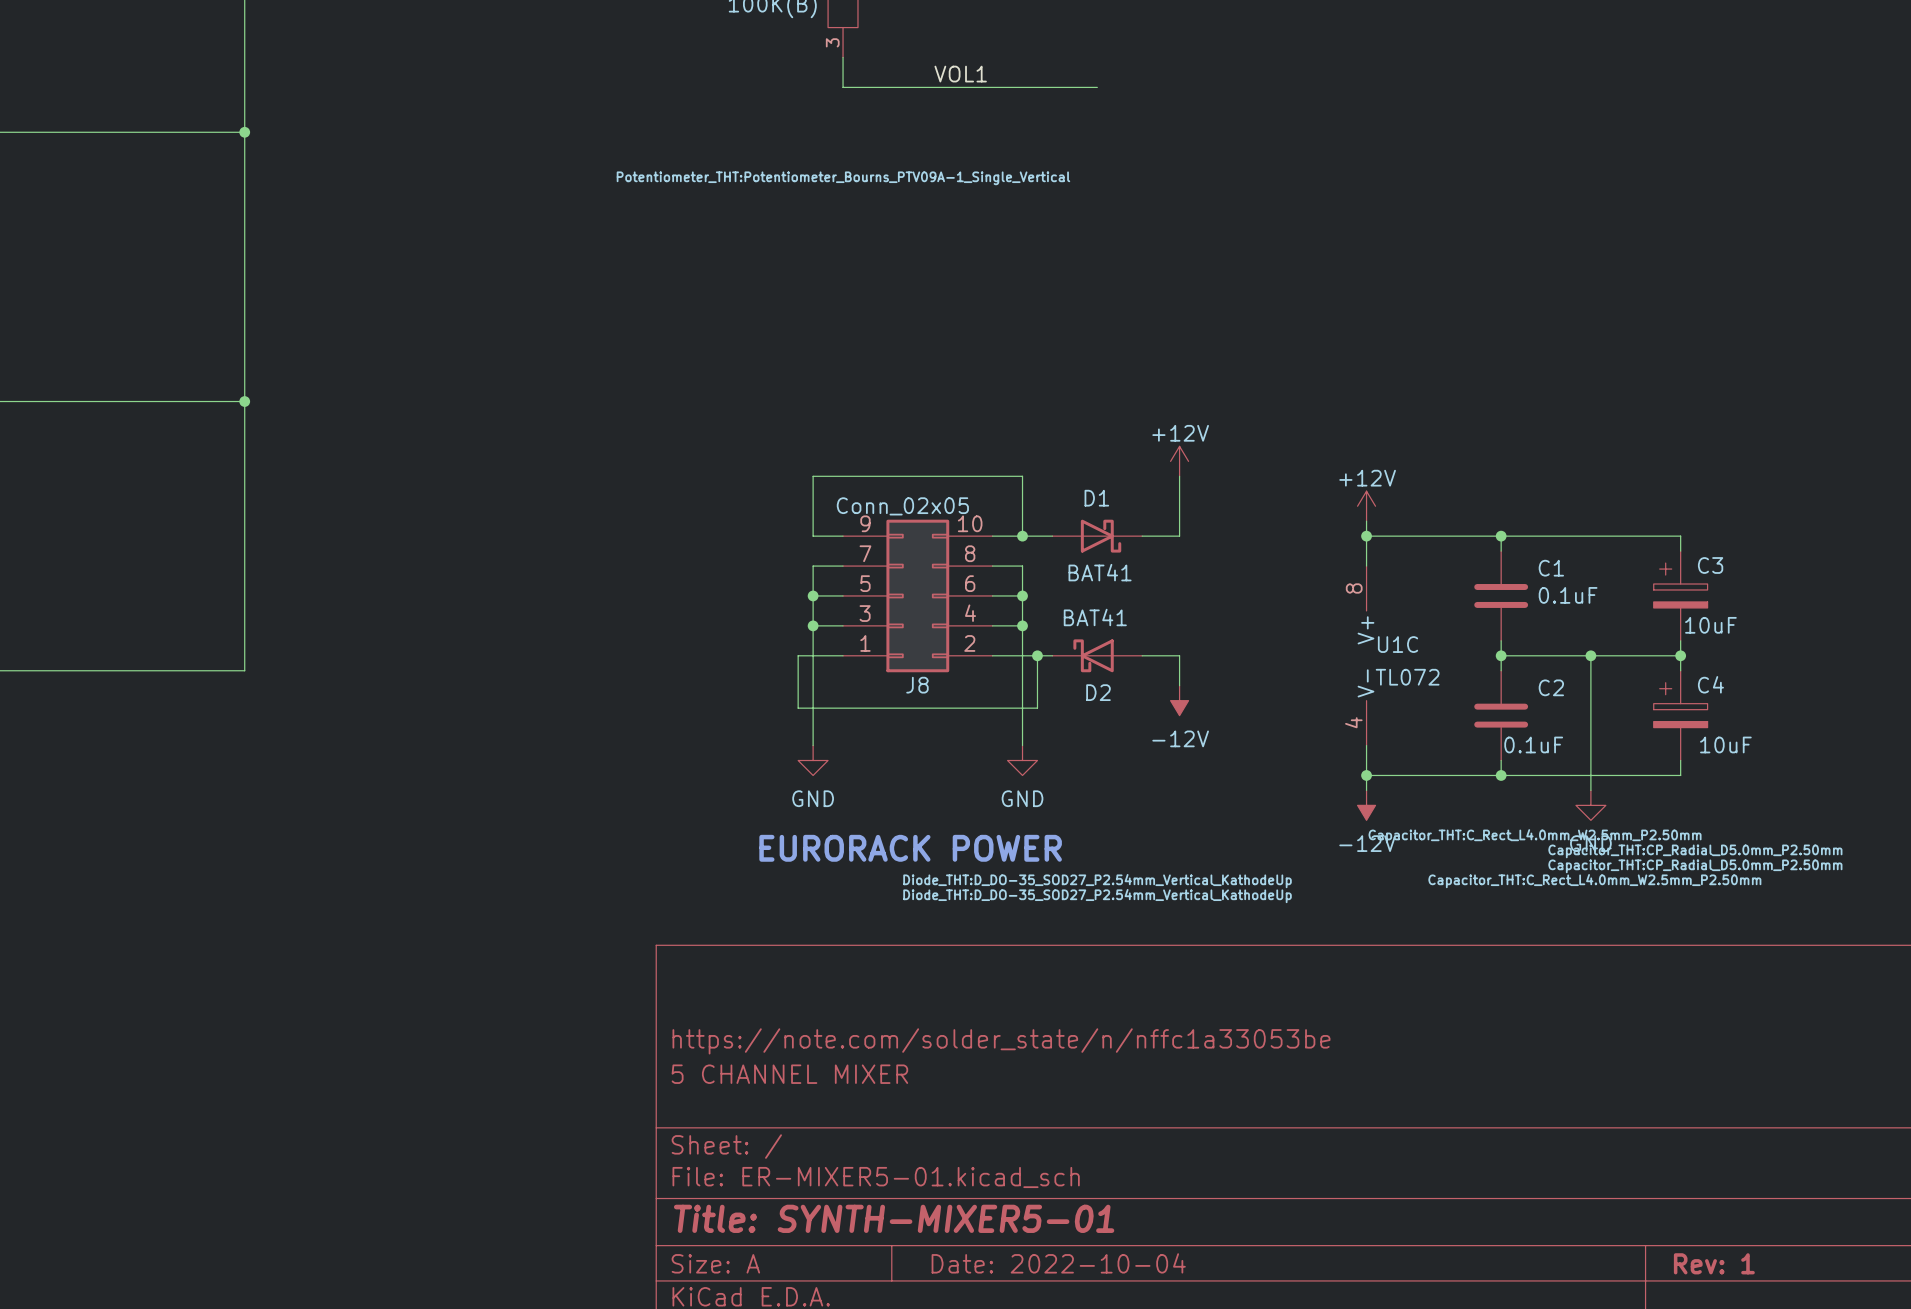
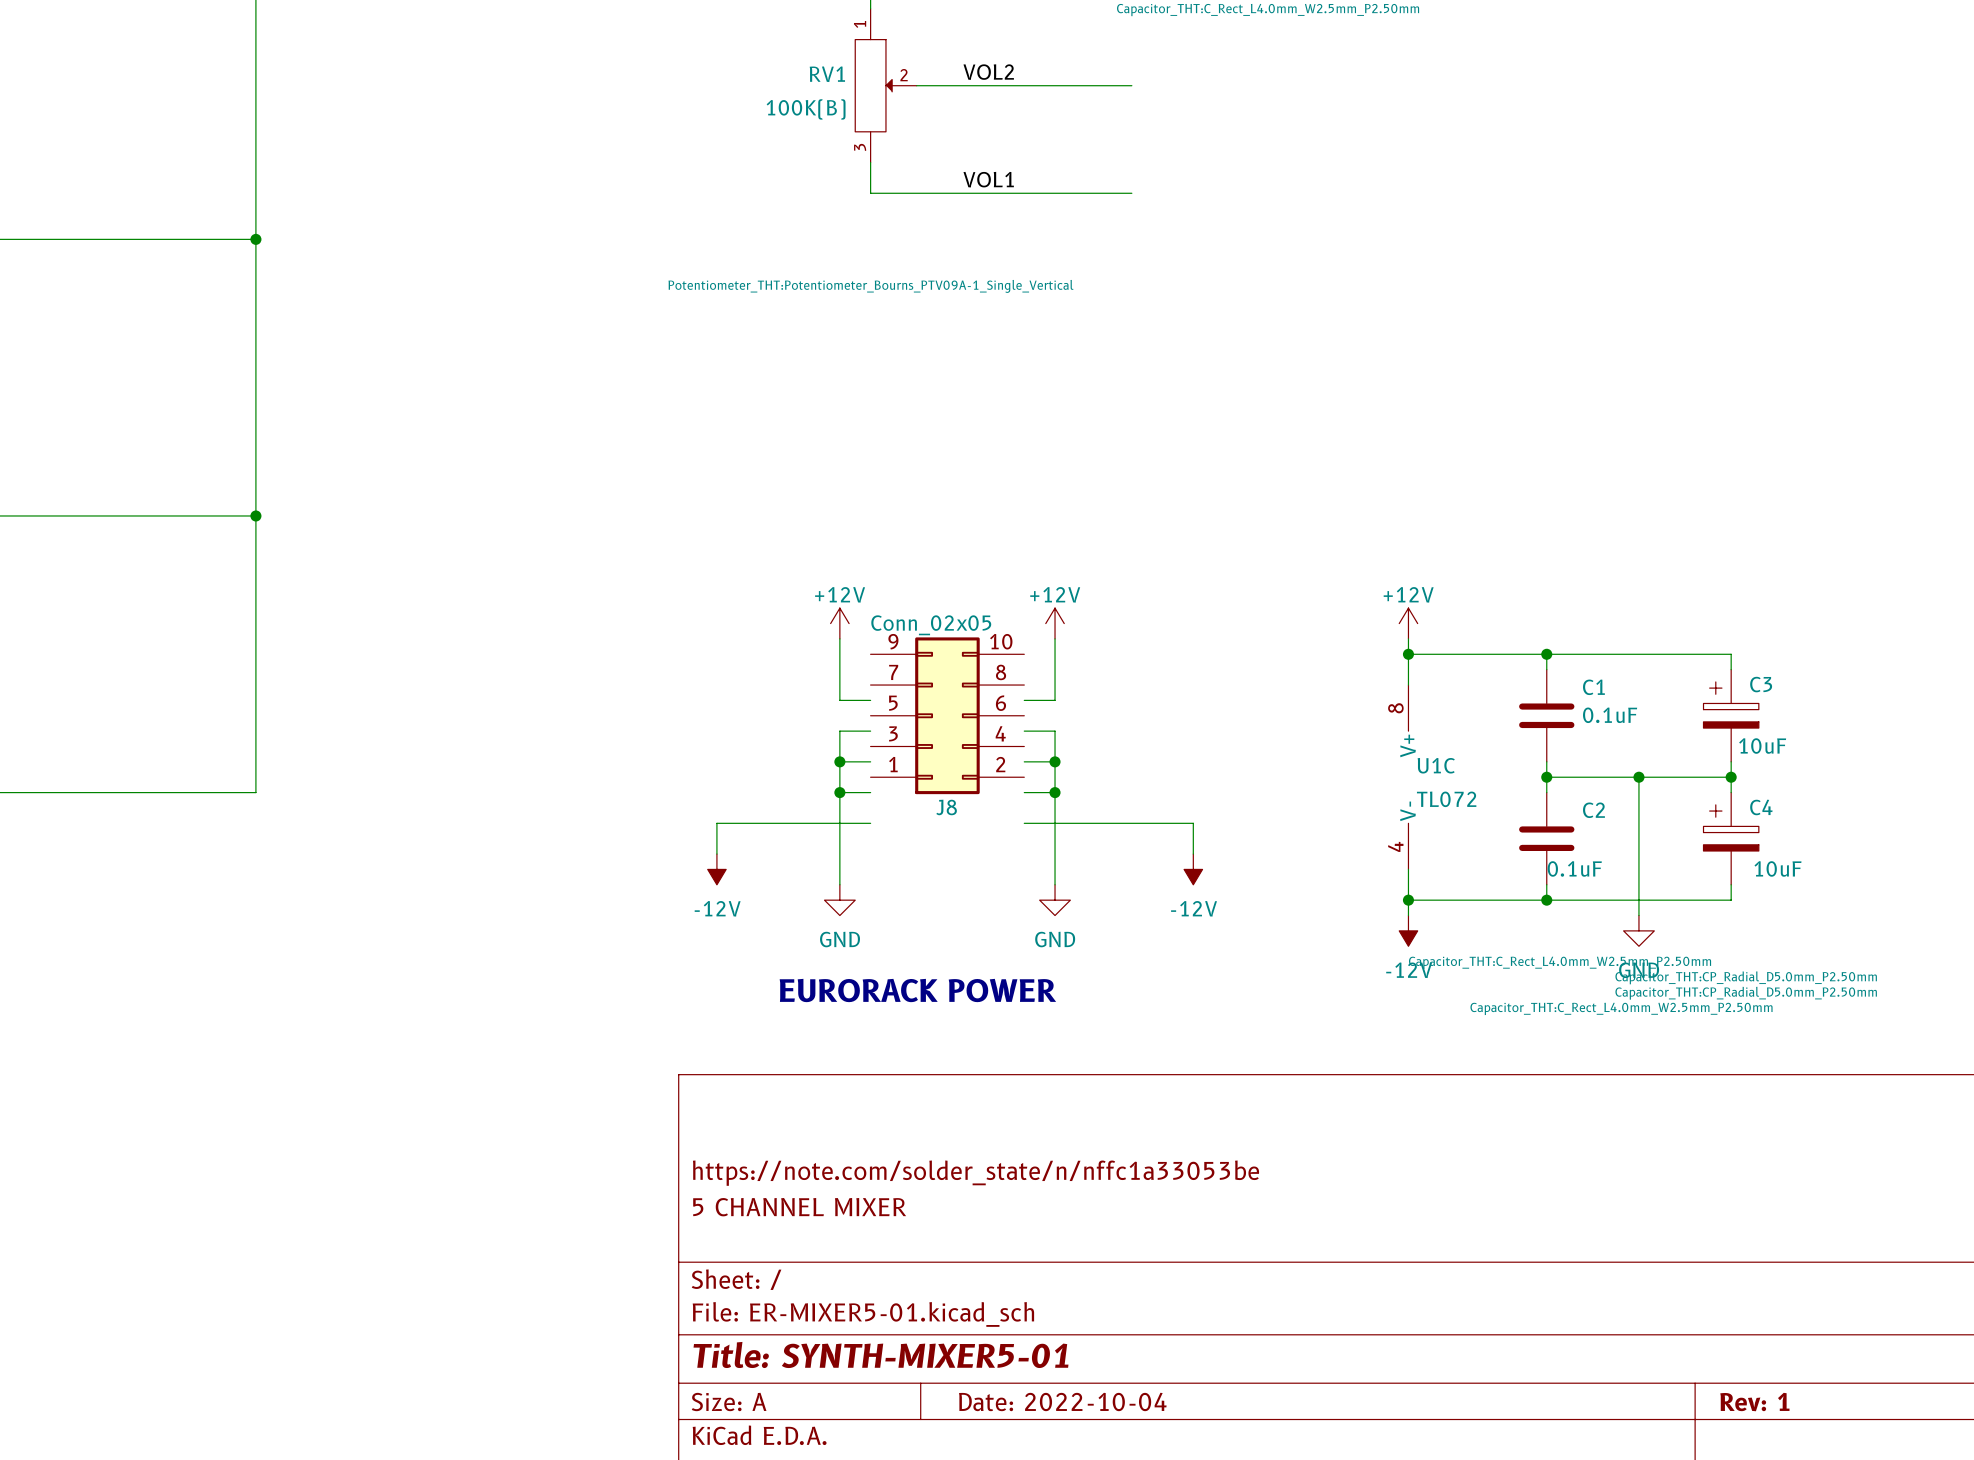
power symbol position: +12V (1179, 461) -> +12V (1055, 623)
wire: (1179, 476) (1179, 536) (1142, 536) -> none
power symbol: none -> +12V (839, 623)
wire: (813, 521) (813, 476) (1022, 476) (1022, 521) -> none
wire: (813, 536) (843, 536) -> (839, 654) (839, 685)
wire: (992, 536) (1052, 536) -> none
junction: (1022, 536) -> none
D1: BAT41 (1097, 536) -> none
wire: (813, 566) (843, 566) -> (839, 731) (870, 731)
wire: (992, 566) (1022, 566) -> (1055, 654) (1055, 685)
wire: (813, 581) (813, 610) -> (839, 700) (870, 700)
wire: (1022, 581) (1022, 610) -> (1055, 700) (1024, 700)
wire: (813, 595) (843, 595) -> (839, 761) (870, 761)
junction: (813, 595) -> none
wire: (992, 595) (1022, 595) -> (1024, 761) (1055, 761)
junction: (1022, 595) -> none
wire: none -> (1024, 731) (1055, 731)
wire: (813, 625) (843, 625) -> (839, 792) (870, 792)
junction position: (813, 625) -> (839, 761)
wire: (992, 625) (1022, 625) -> (1024, 792) (1055, 792)
junction: (1022, 625) -> none
junction: none -> (1055, 761)
wire: (843, 655) (798, 655) (798, 708) (1037, 708) (1037, 655) -> none
wire: (992, 655) (1052, 655) -> none
junction: (1037, 655) -> none
D2: BAT41 (1097, 655) -> none
wire: (1142, 655) (1179, 655) (1179, 685) -> none
junction: none -> (839, 792)
junction: none -> (1055, 792)
wire: none -> (870, 823) (716, 823) (716, 854)
wire: none -> (1024, 823) (1193, 823) (1193, 854)
power symbol position: -12V (1179, 700) -> -12V (1193, 869)
power symbol: none -> -12V (716, 869)
power symbol position: GND (813, 760) -> GND (839, 900)
power symbol position: GND (1022, 760) -> GND (1055, 900)
text position: EURORACK POWER (910, 848) -> EURORACK POWER (917, 990)

